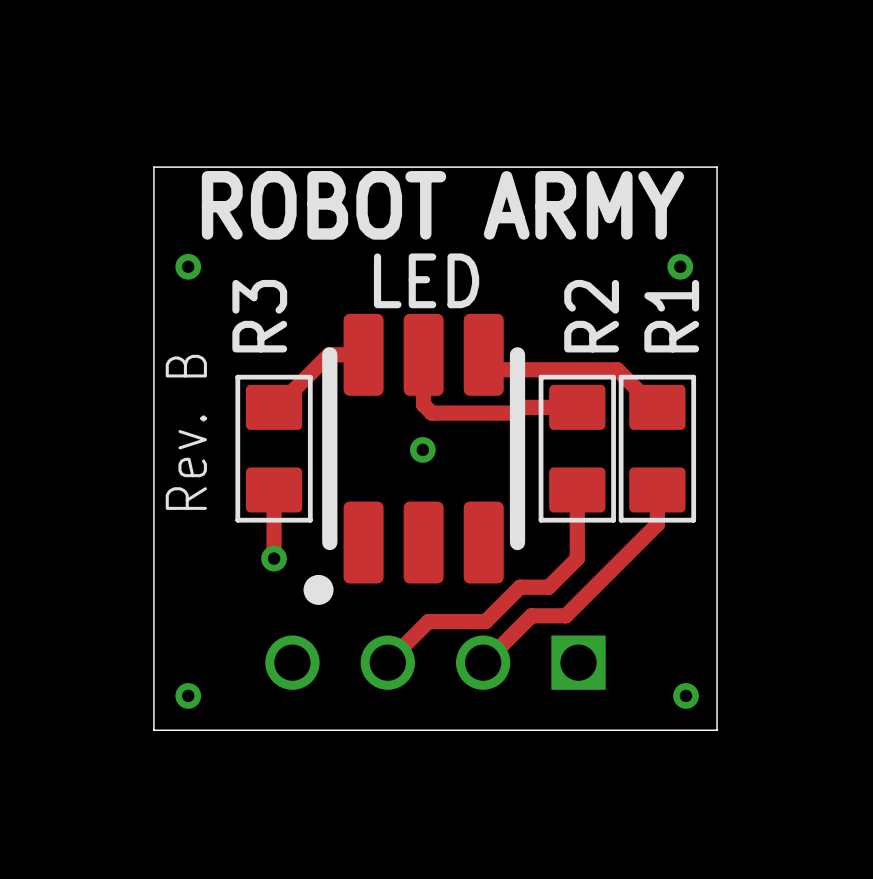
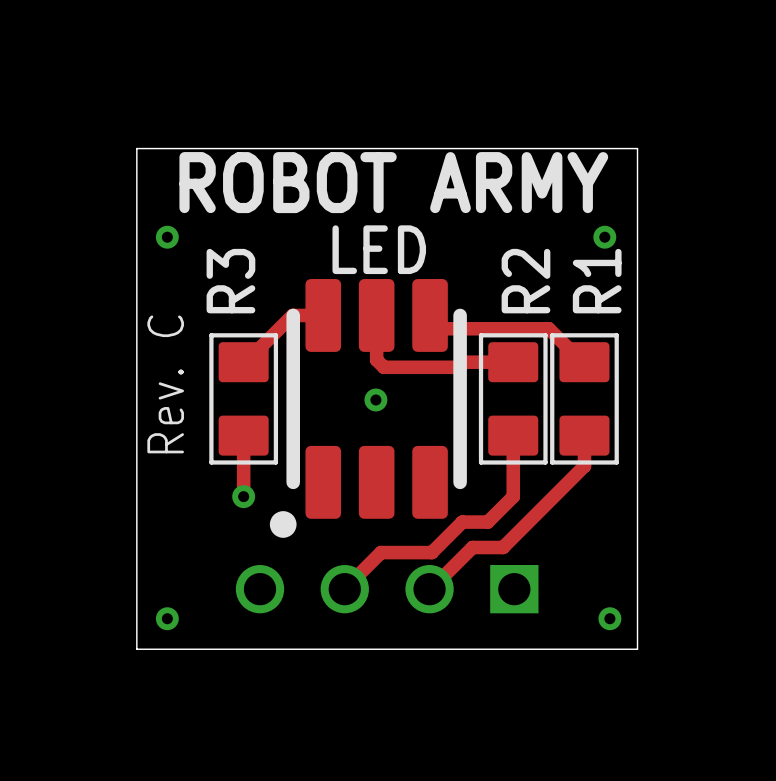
text: Rev. B (186, 432) -> Rev. C (165, 384)

